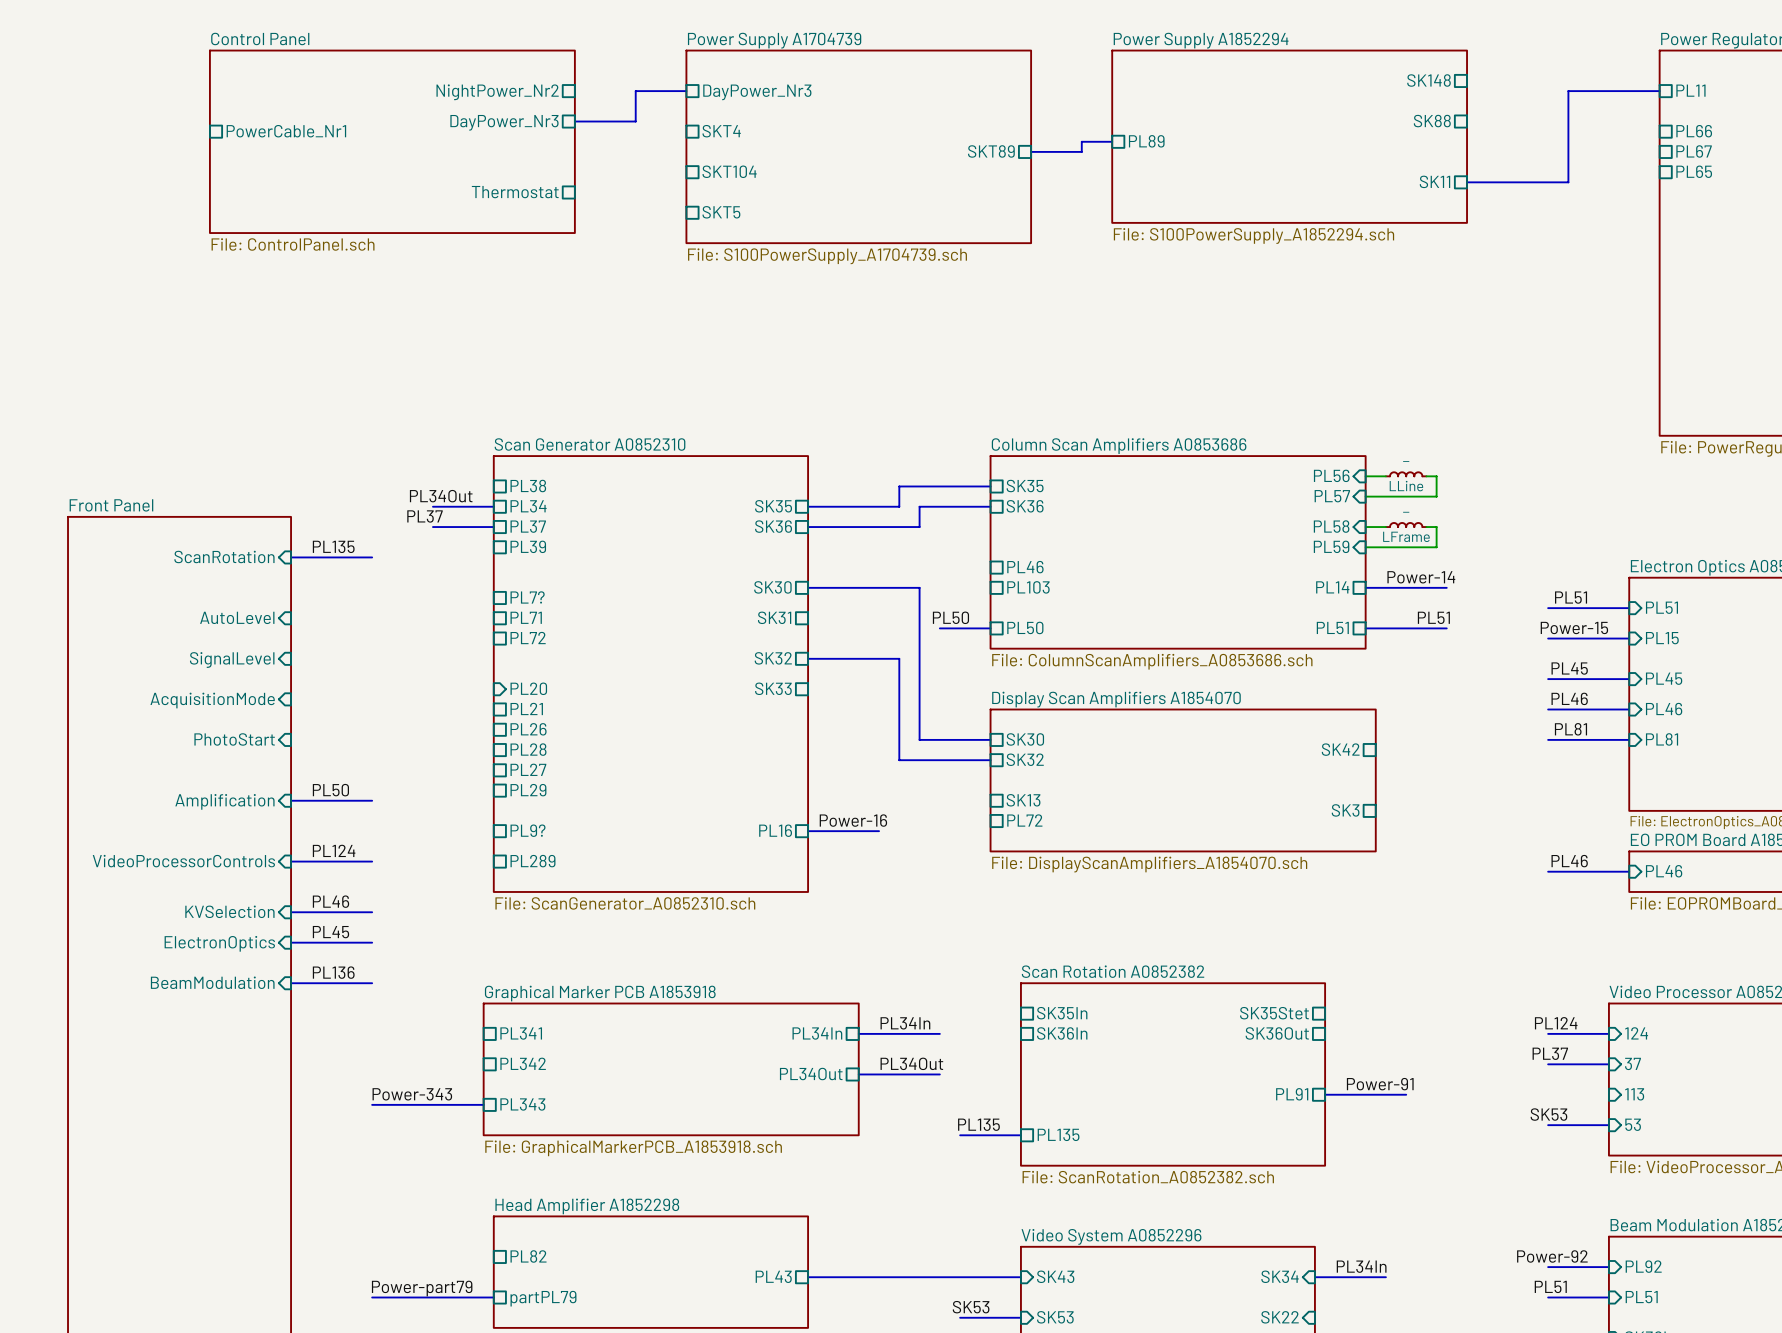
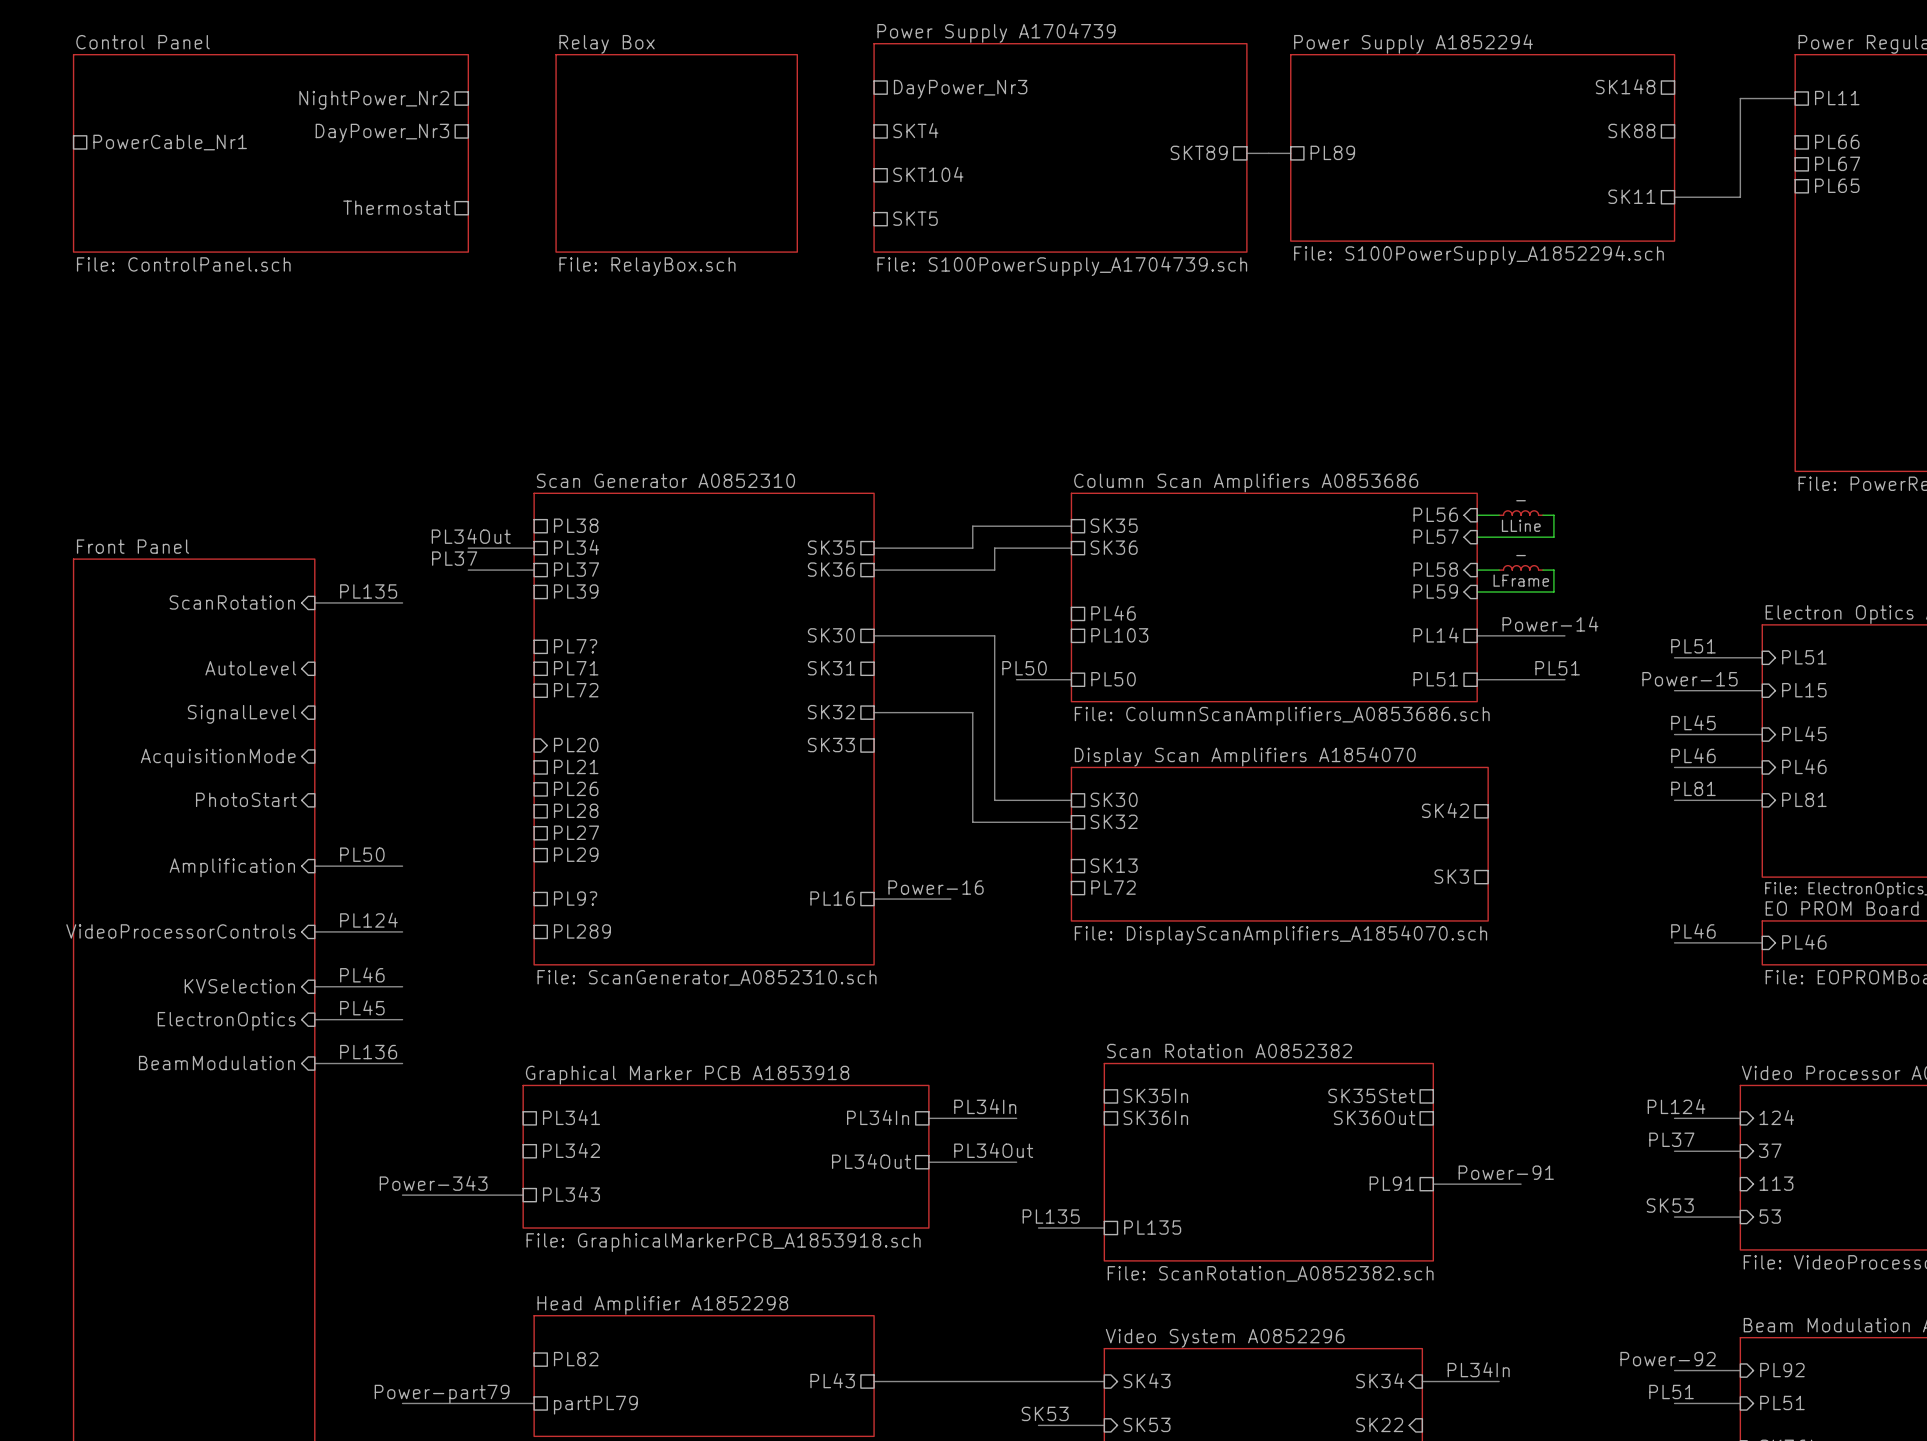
sheet pin position: SK148 (1429, 80) -> SK148 (1625, 86)
bus: (686, 91) (635, 91) (635, 121) (574, 121) -> none
bus: (1608, 91) (1568, 91) (1568, 182) -> (1740, 98) (1740, 197) (1696, 197)
sheet pin position: NightPower_Nr2 (497, 92) -> NightPower_Nr2 (374, 100)
sheet pin position: DayPower_Nr3 (757, 92) -> DayPower_Nr3 (960, 89)
sheet pin position: SK88 (1432, 121) -> SK88 (1631, 130)
sheet pin position: DayPower_Nr3 (504, 122) -> DayPower_Nr3 (382, 133)
sheet pin position: PowerCable_Nr1 (286, 131) -> PowerCable_Nr1 (170, 142)
sheet pin position: SKT4 (721, 131) -> SKT4 (915, 130)
sheet Power Supply A1852294 position: (1289, 136) -> (1482, 147)
sheet Control Panel position: (392, 141) -> (270, 153)
sheet Relay Box: none -> File: RelayBox.sch (676, 153)
bus: (1112, 141) (1081, 141) (1081, 151) (1031, 151) -> none
sheet pin position: PL89 (1146, 141) -> PL89 (1332, 152)
bus: none -> (1246, 153) (1290, 153)
sheet Power Supply A1704739 position: (858, 146) -> (1060, 147)
sheet pin position: SKT89 (991, 151) -> SKT89 (1199, 152)
sheet pin position: SKT104 (729, 171) -> SKT104 (928, 174)
sheet pin position: SK11 (1434, 181) -> SK11 (1631, 196)
bus: (1467, 182) (1548, 182) -> none
sheet pin position: Thermostat (515, 192) -> Thermostat (396, 207)
sheet pin position: SKT5 (721, 212) -> SKT5 (915, 218)

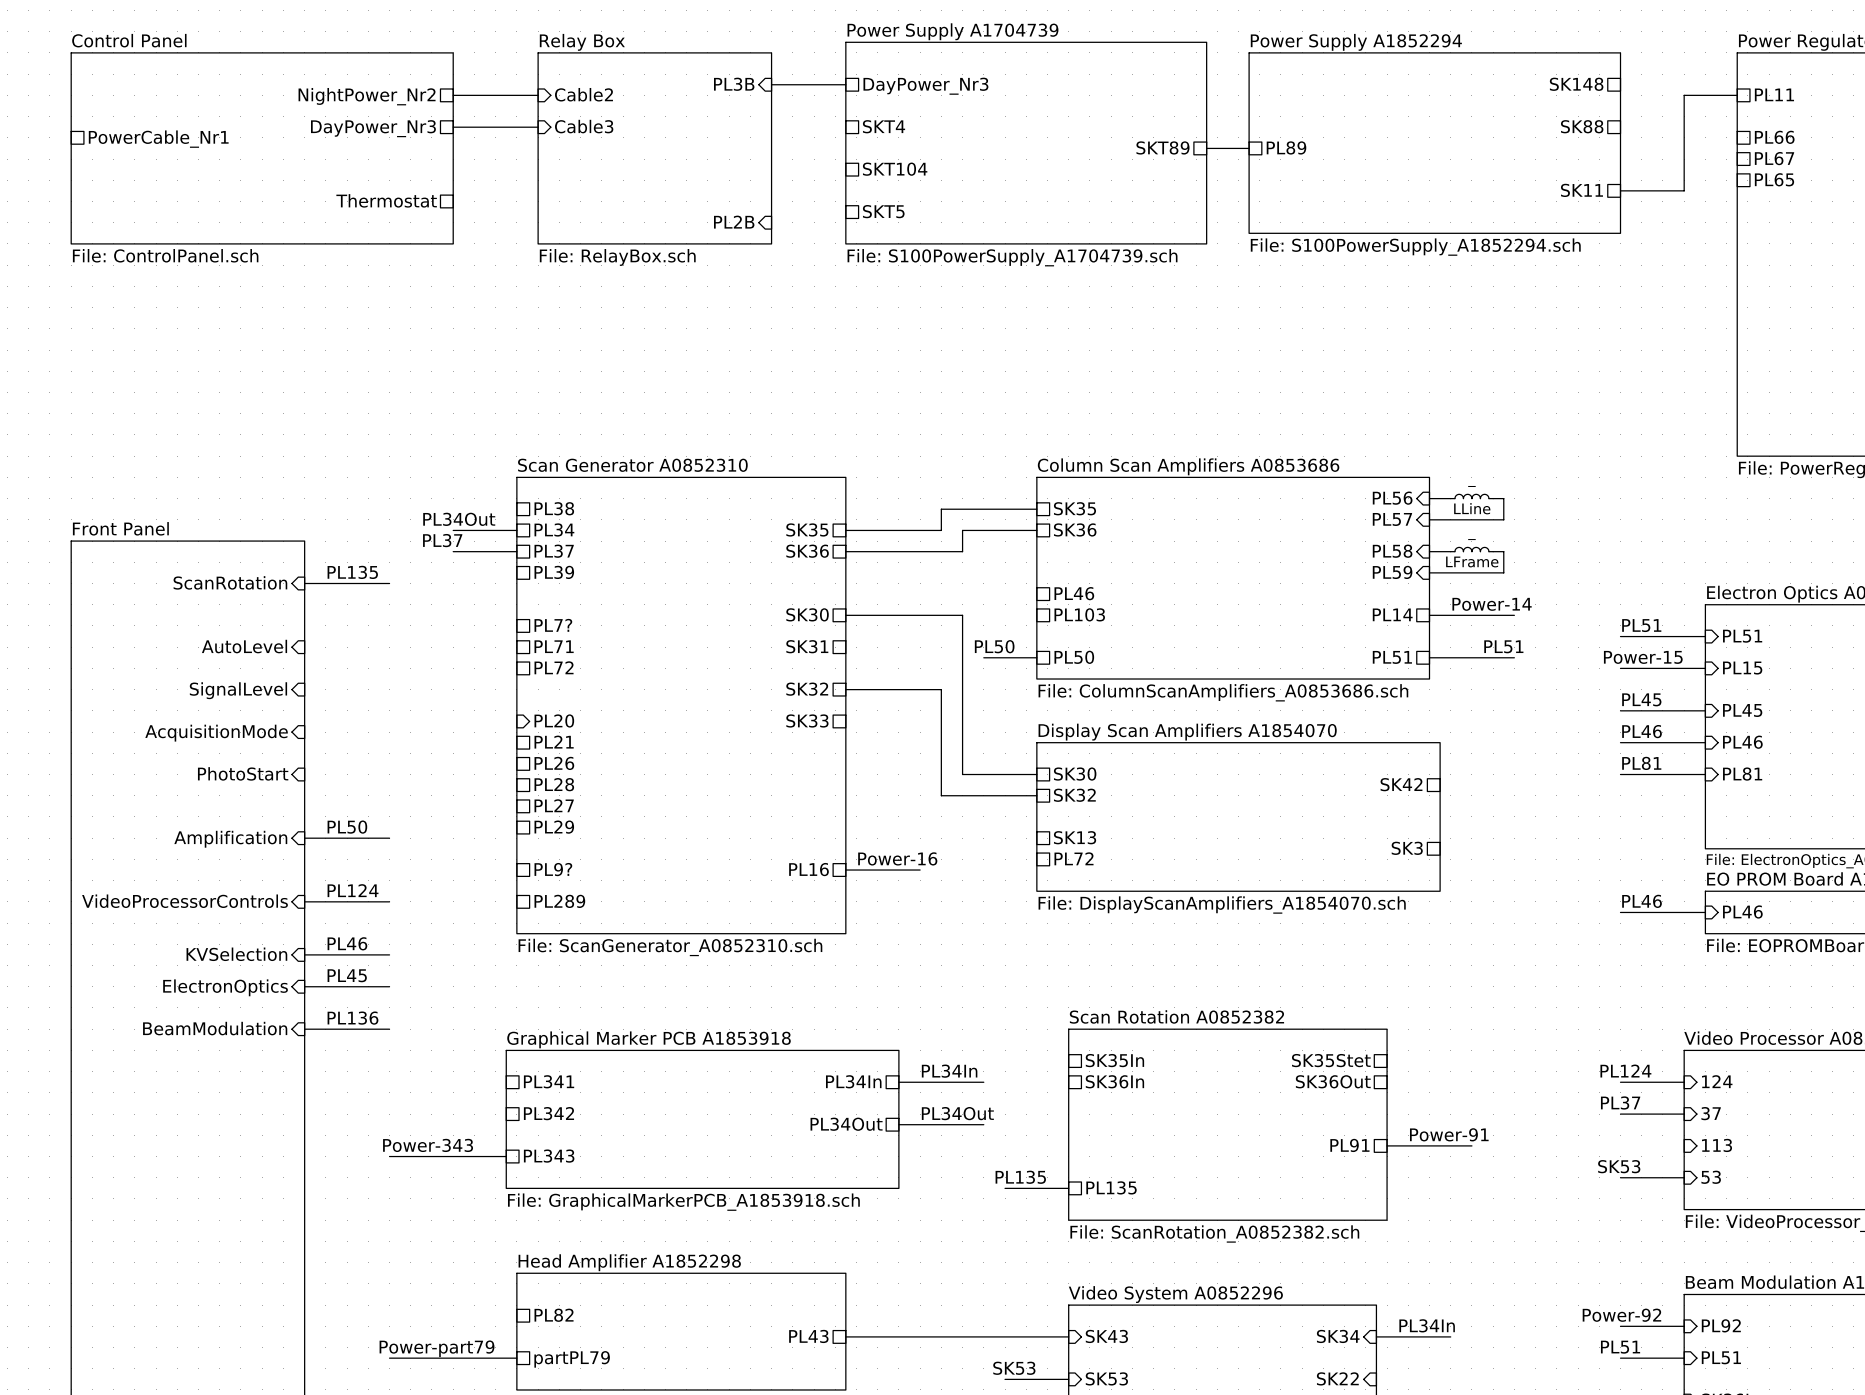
sheet pin: none -> PL3B (734, 84)
bus: none -> (771, 84) (845, 84)
bus: none -> (453, 95) (538, 95)
sheet pin: none -> Cable2 (583, 94)
sheet pin: none -> Cable3 (584, 126)
bus: none -> (453, 127) (538, 127)
sheet pin: none -> PL2B (734, 222)

